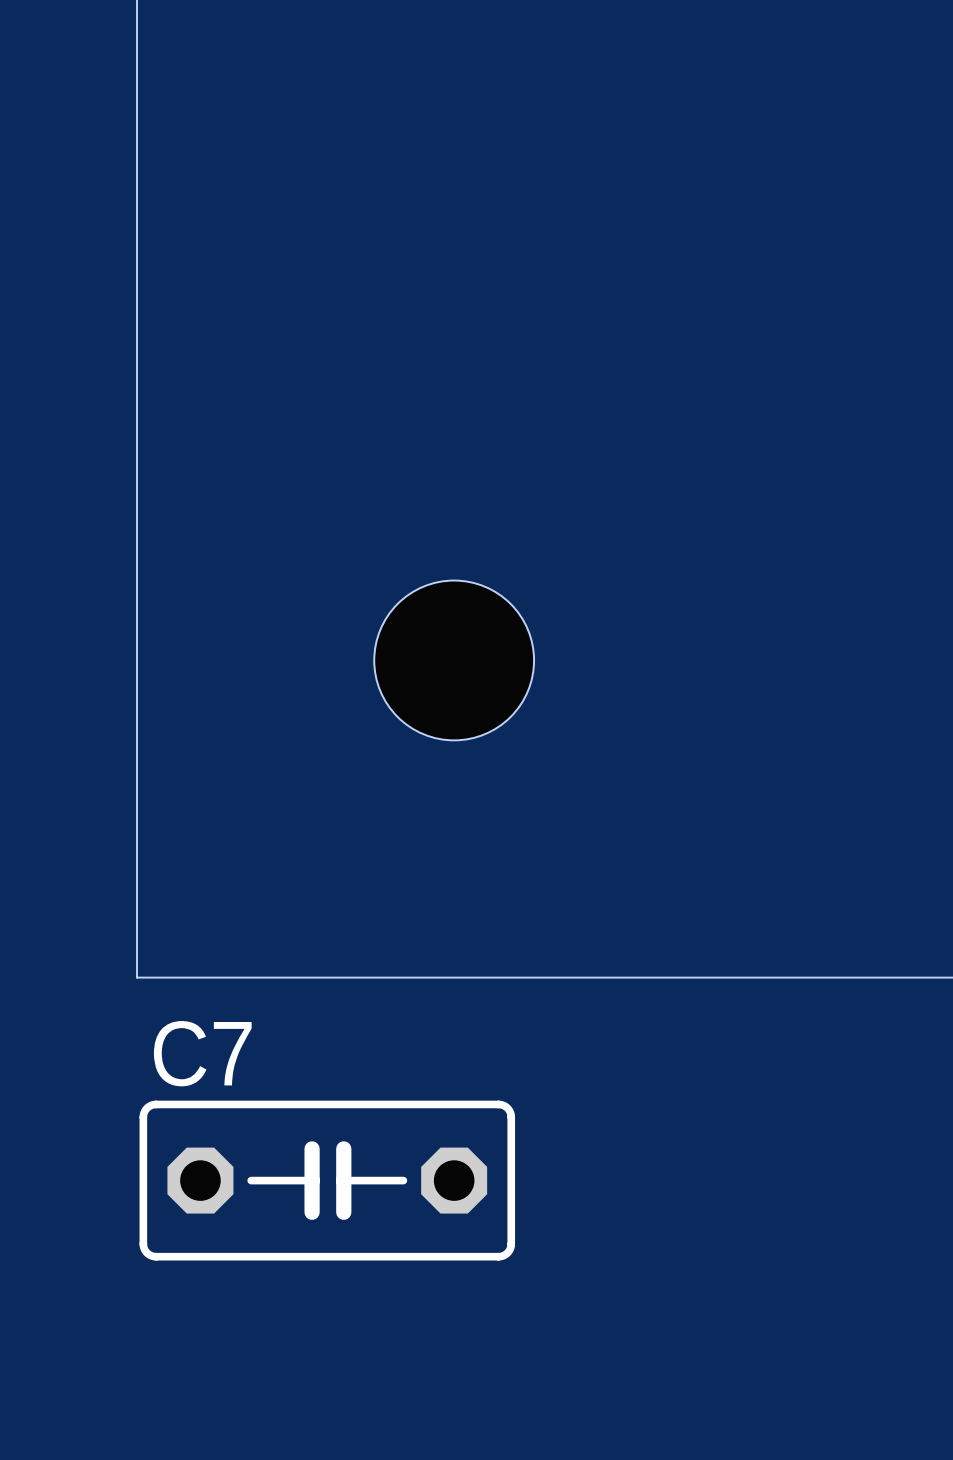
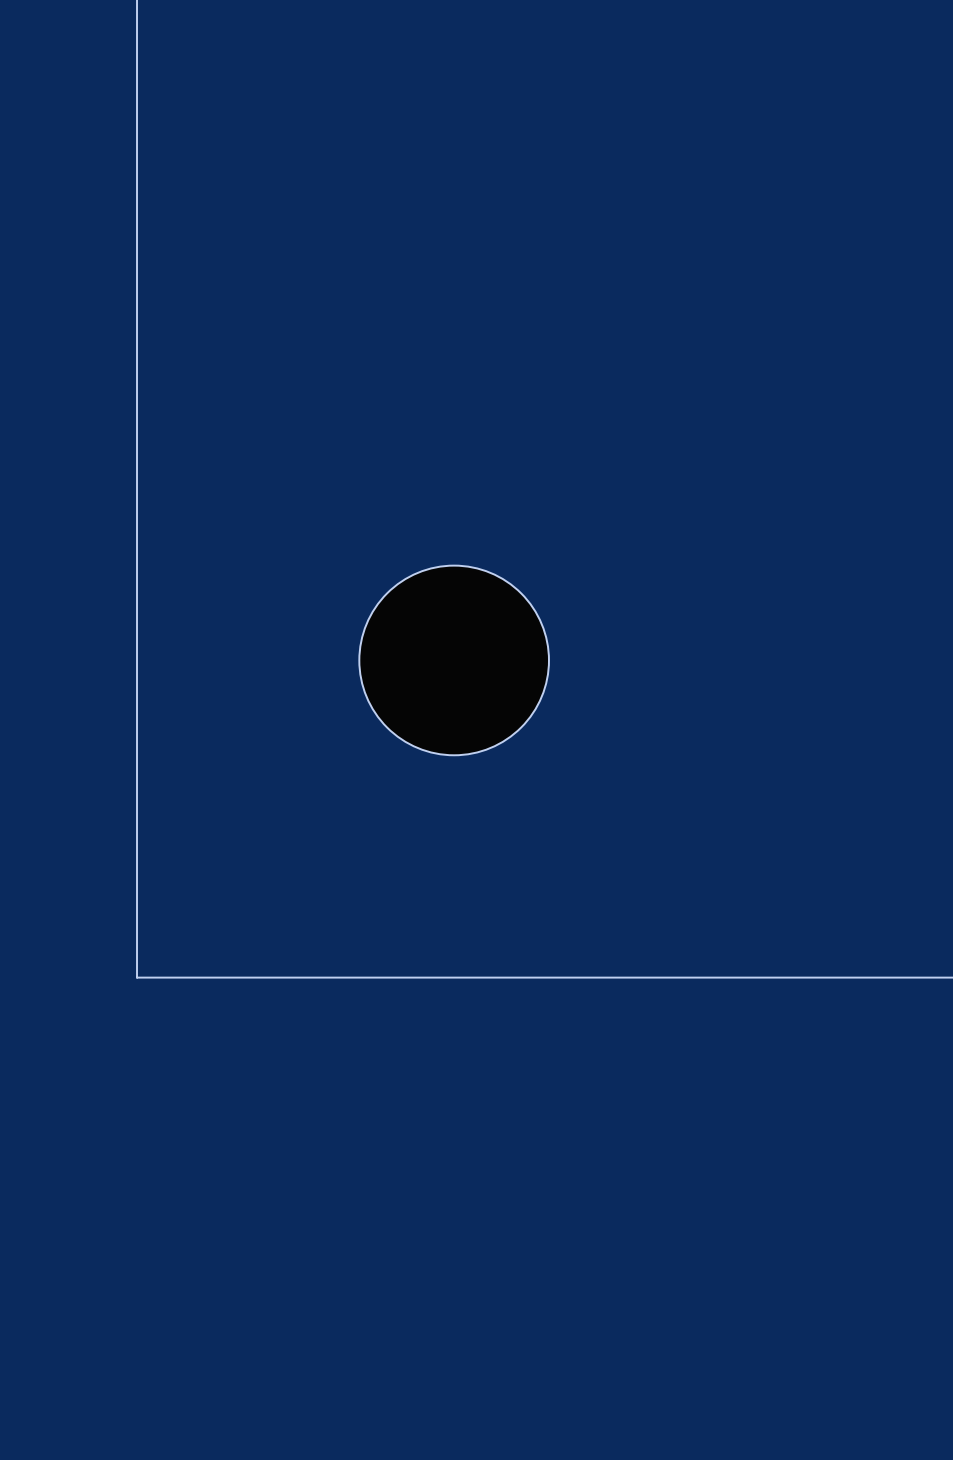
hole size: [374, 580, 535, 741] -> [359, 565, 549, 756]
C7: (327, 1180) -> none

